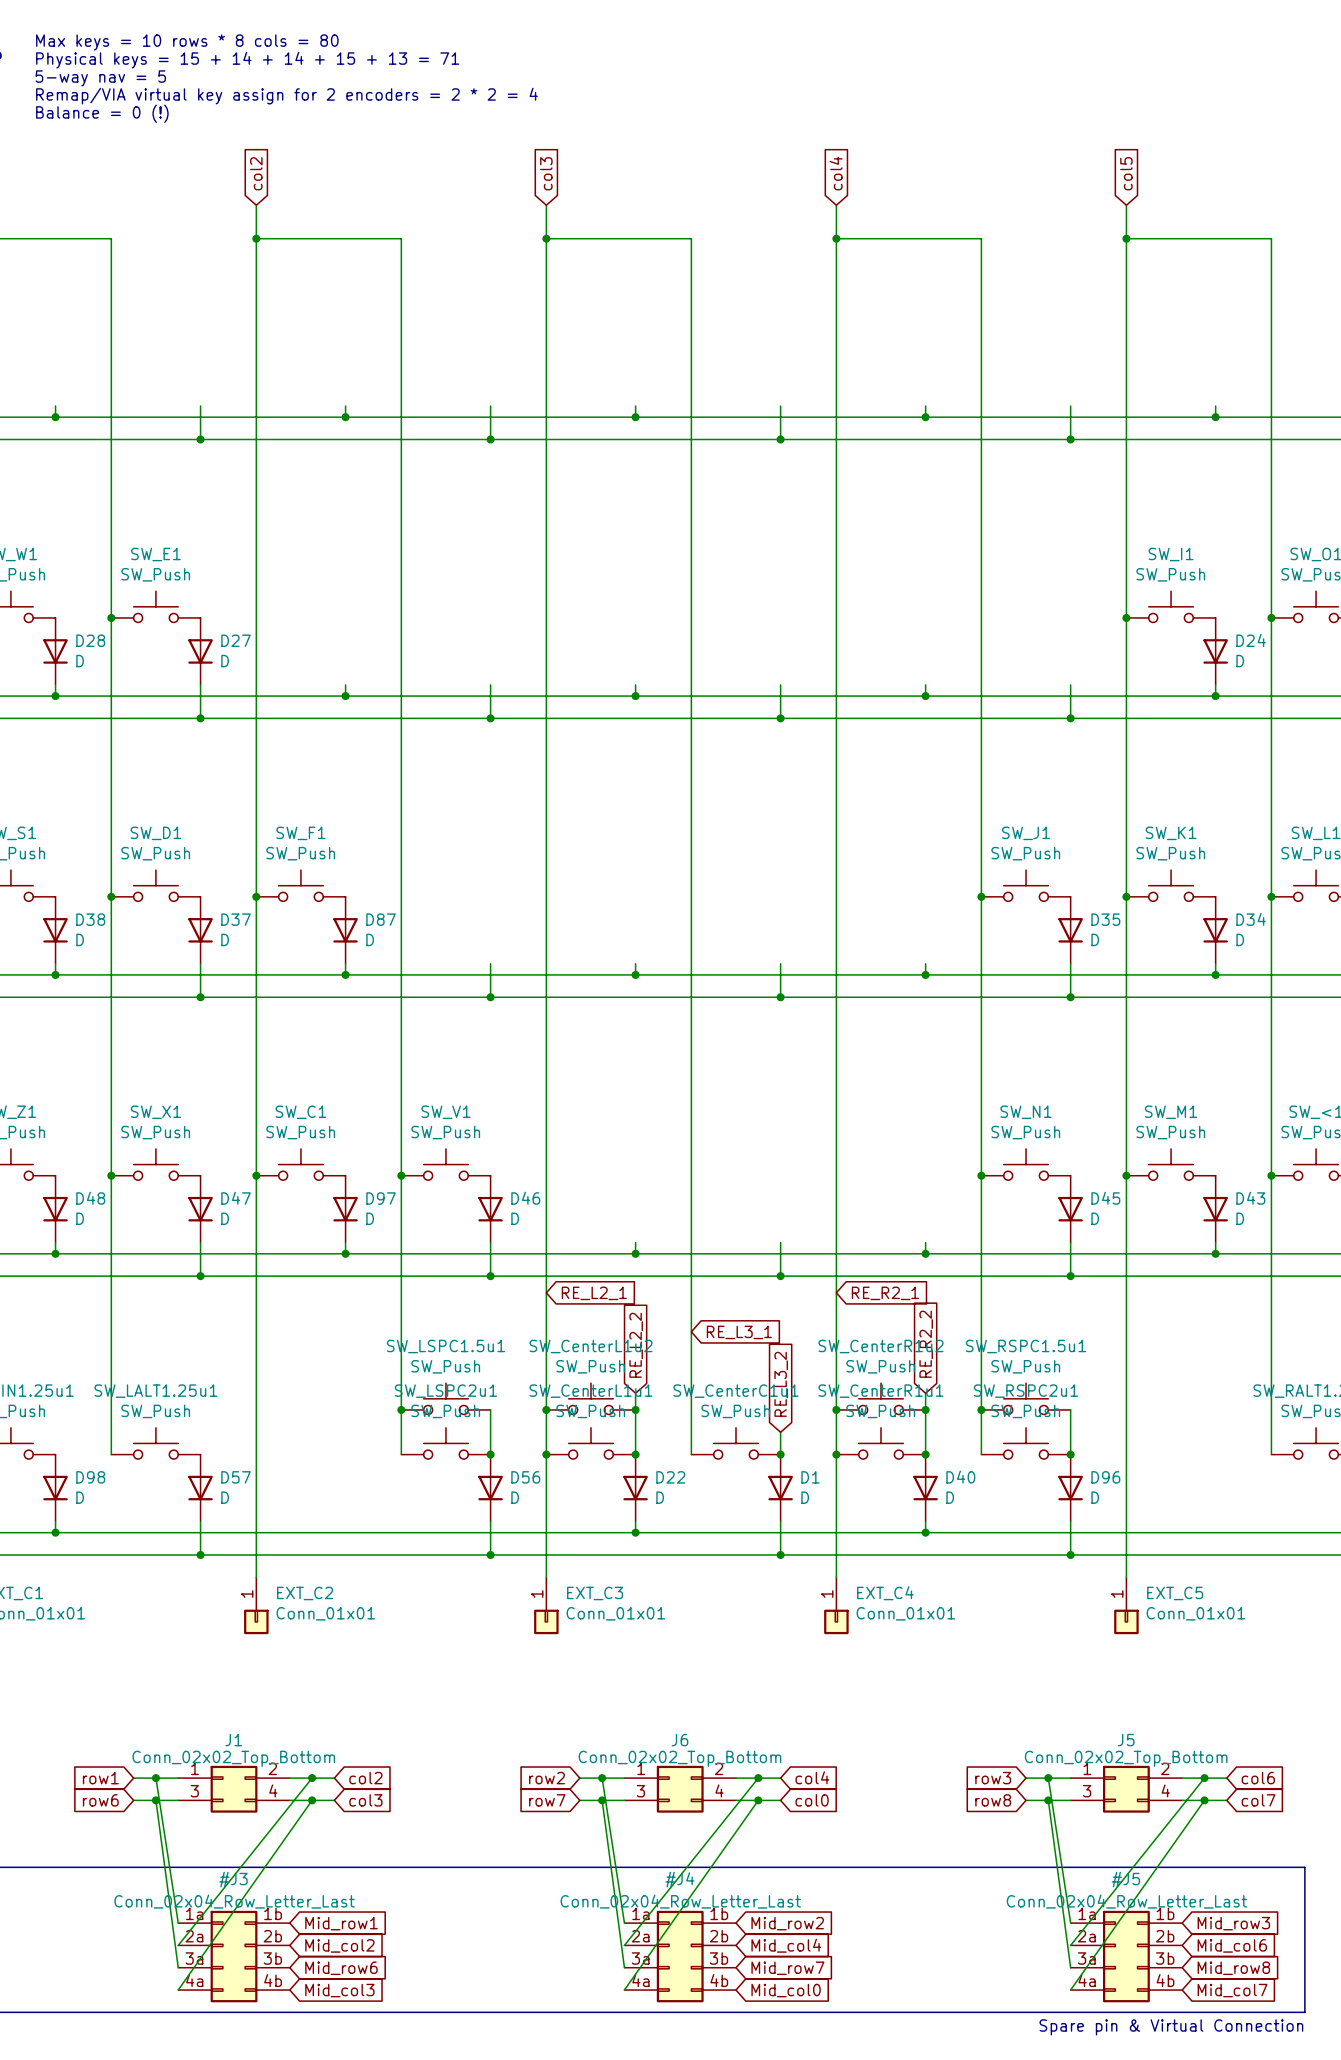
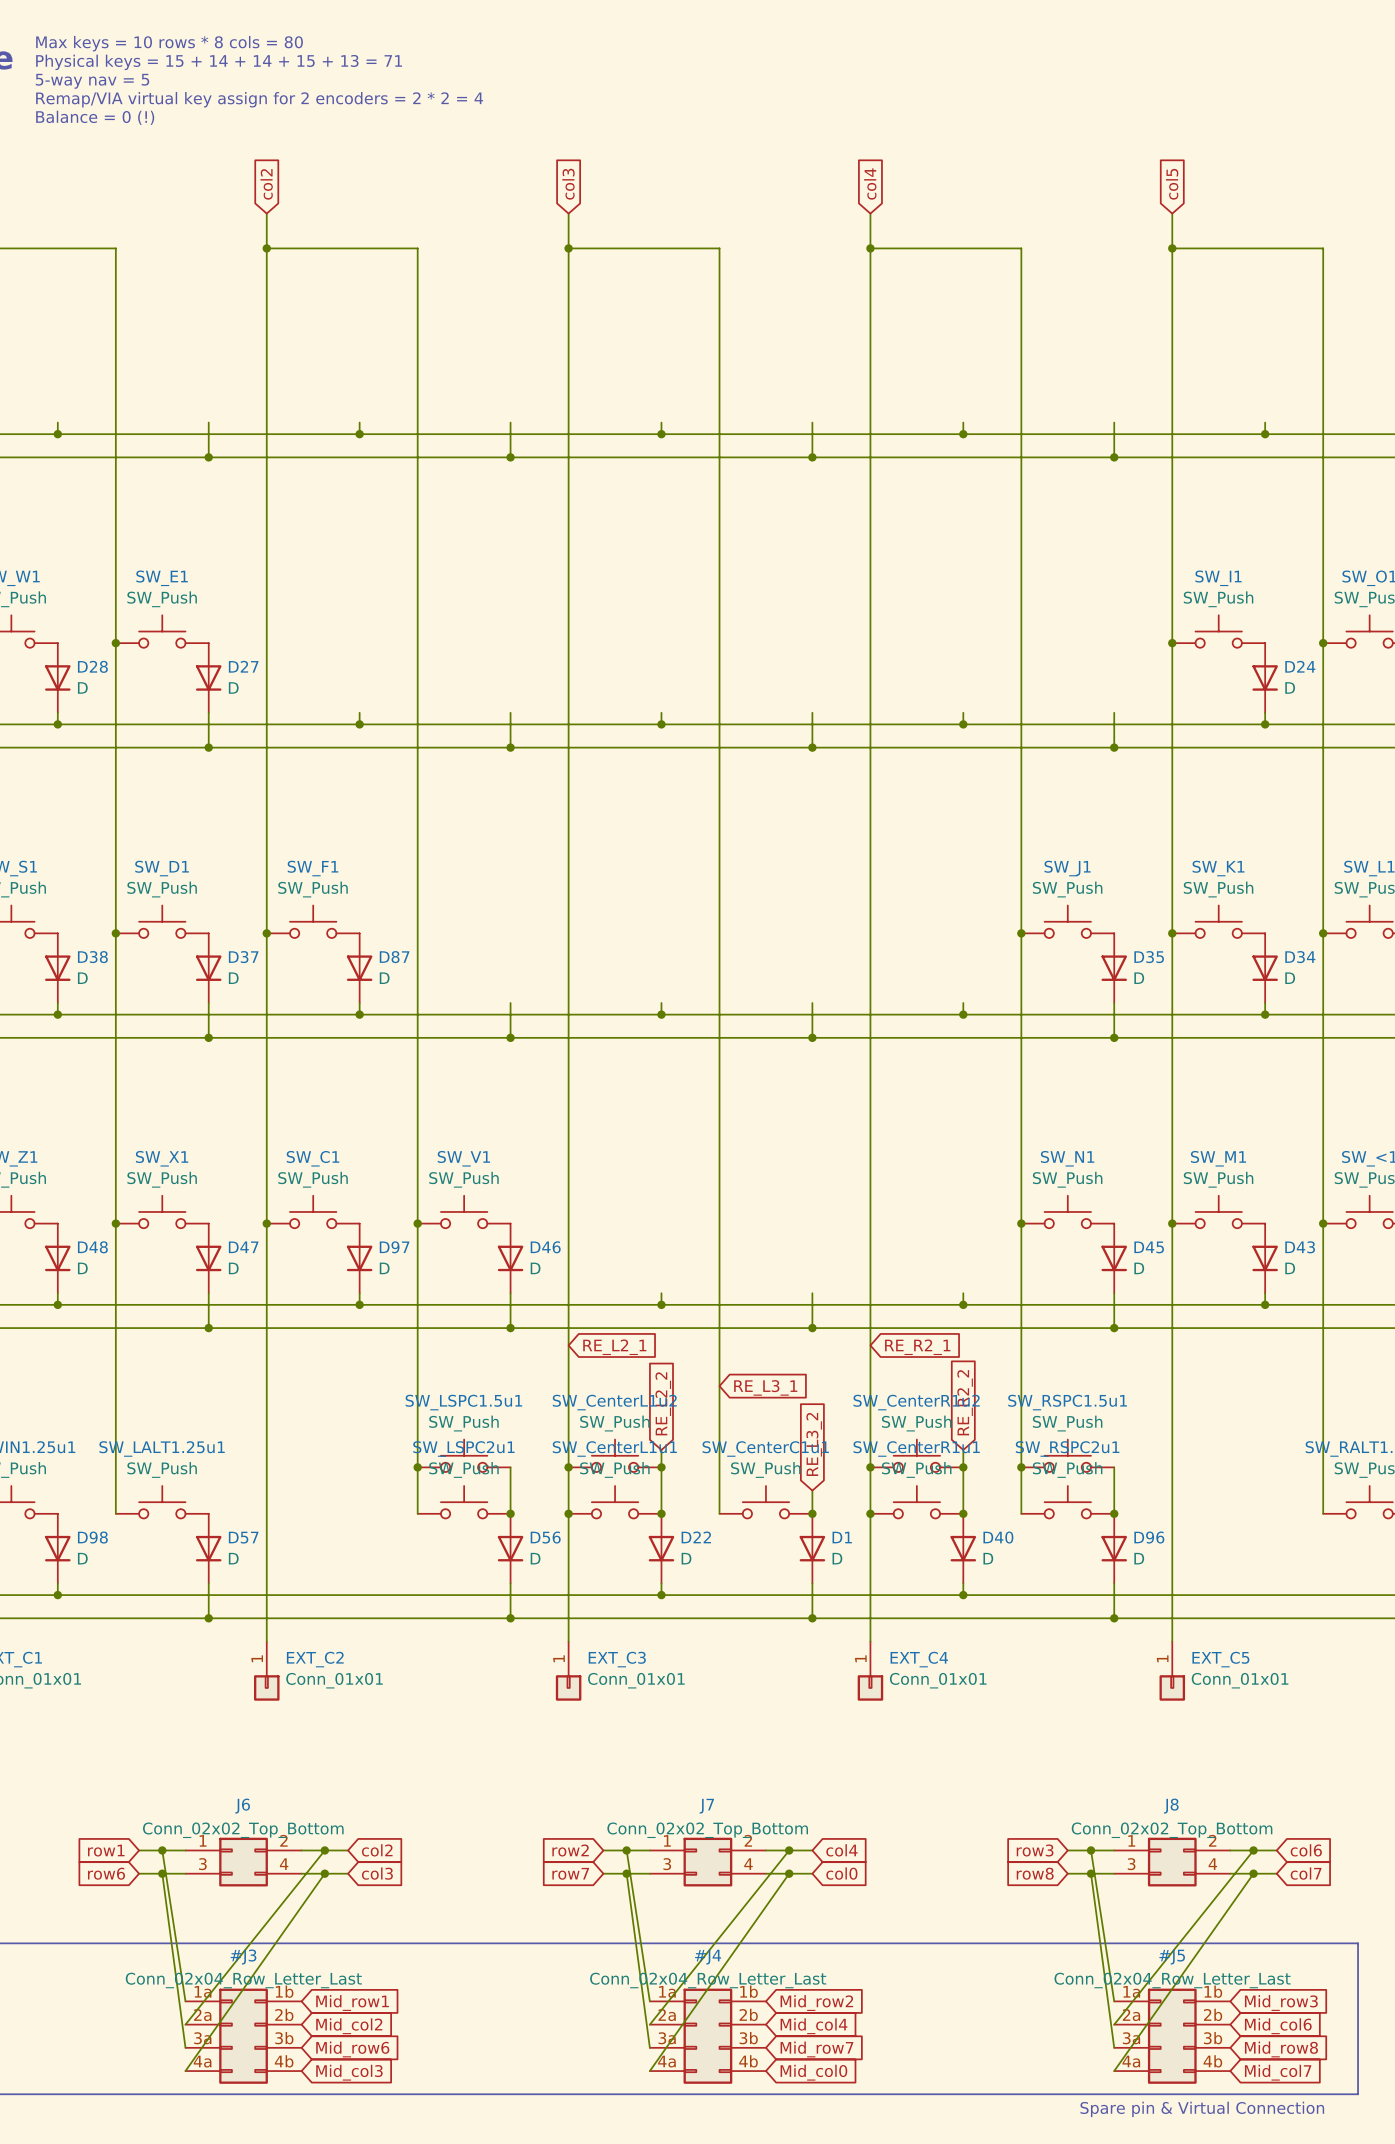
J1 name: J1 (233, 1740) -> J6 (242, 1806)
J6 name: J6 (679, 1740) -> J7 (706, 1806)
J5 name: J5 (1126, 1740) -> J8 (1171, 1806)

